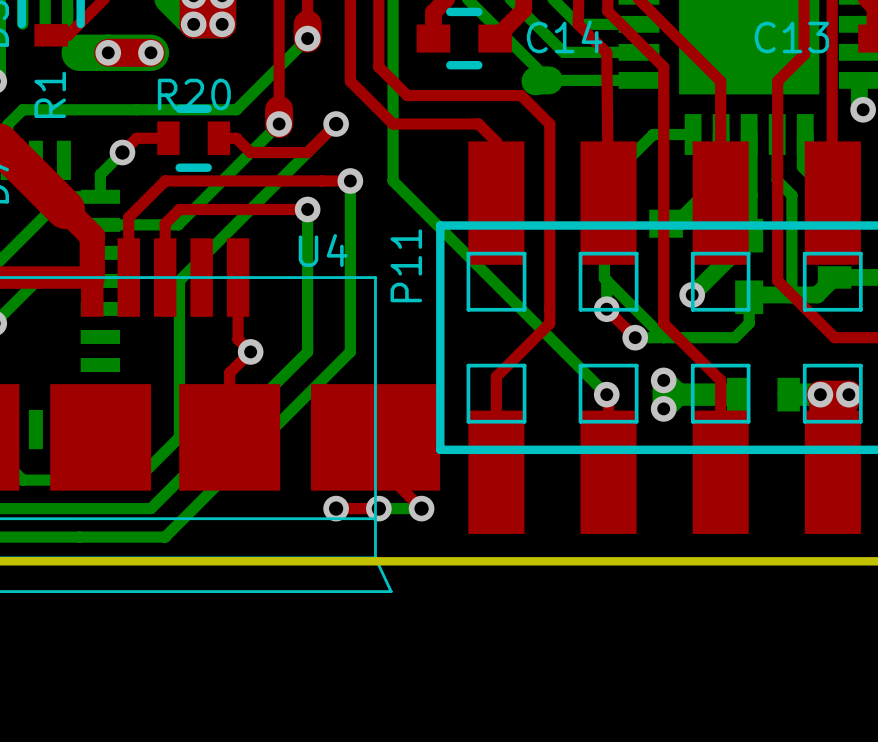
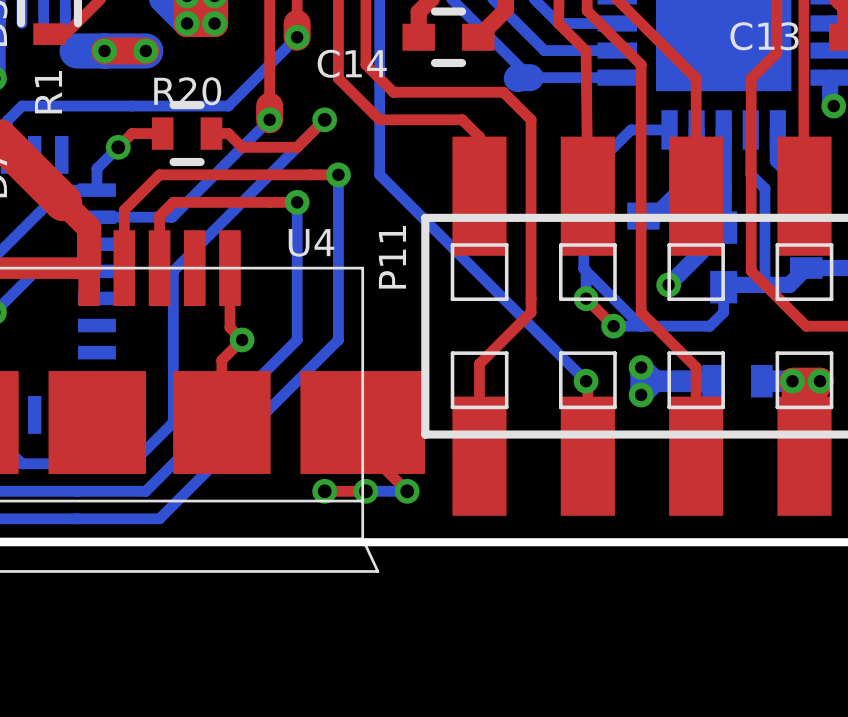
C14 name position: C14 (564, 36) -> C14 (352, 63)

